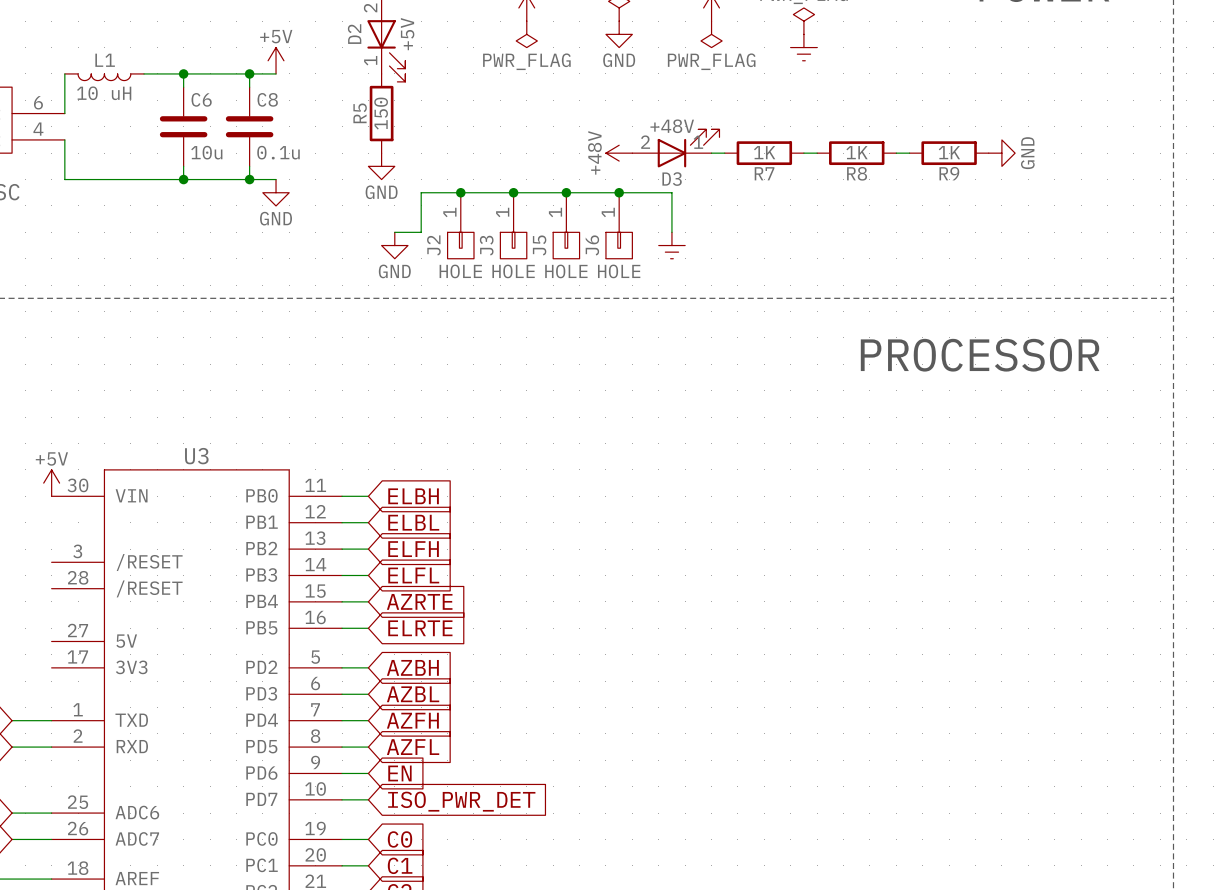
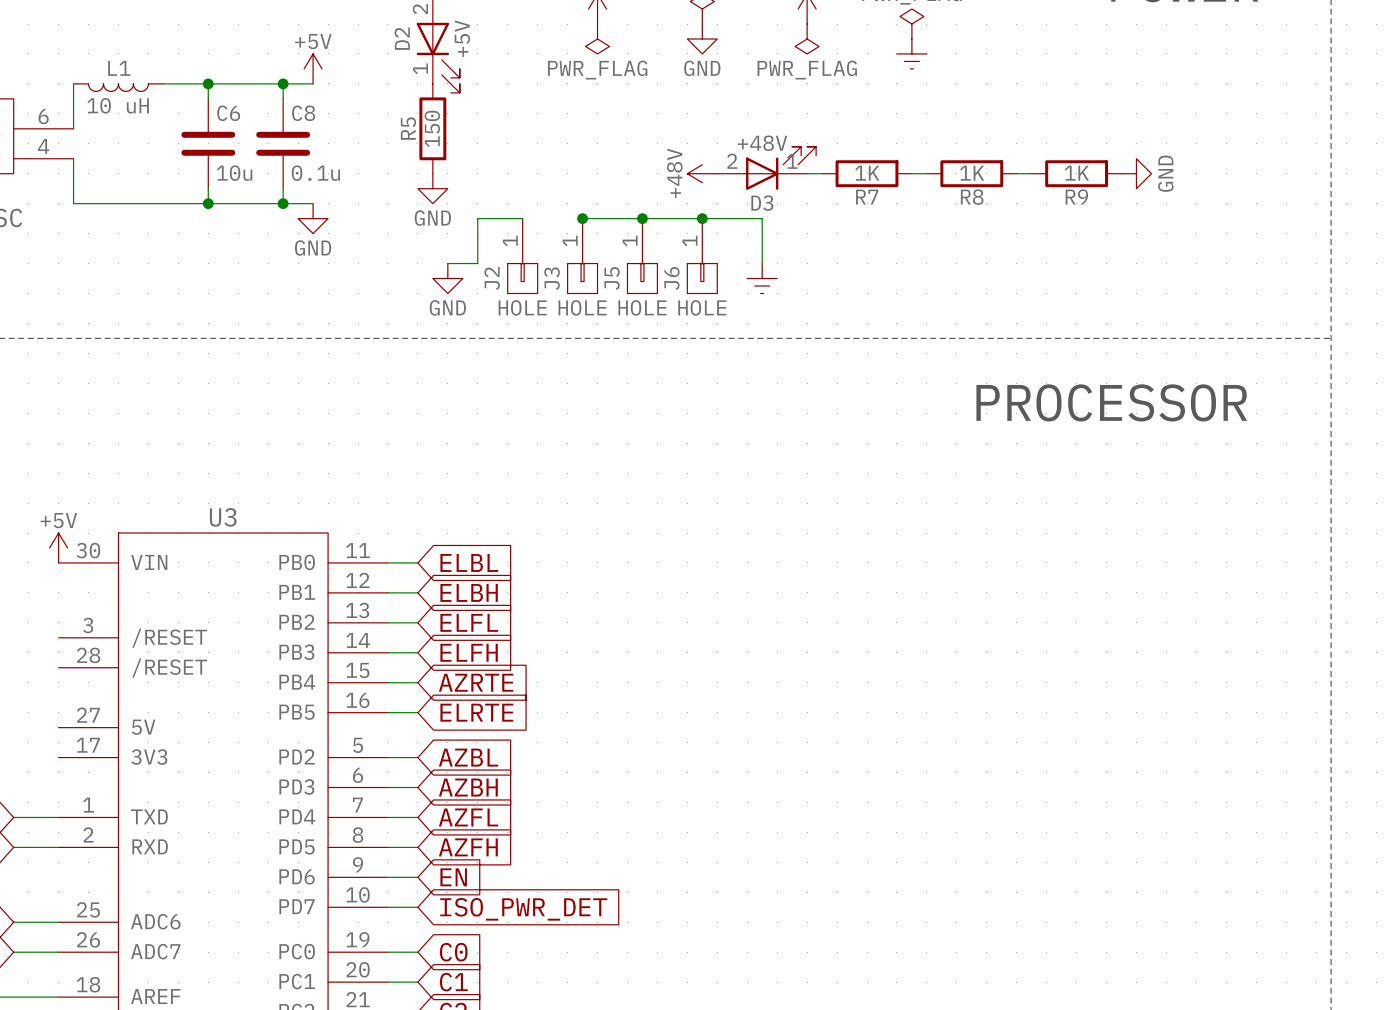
wire: (460, 192) (513, 192) -> none
junction: (460, 192) -> none
global label: ELBH (413, 496) -> ELBL (469, 562)
global label: ELBL (413, 522) -> ELBH (469, 592)
global label: ELFH (413, 549) -> ELFL (469, 622)
global label: ELFL (413, 575) -> ELFH (469, 652)
global label: AZBH (412, 667) -> AZBL (468, 757)
global label: AZBL (413, 694) -> AZBH (468, 787)
global label: AZFH (412, 720) -> AZFL (468, 817)
global label: AZFL (413, 747) -> AZFH (468, 847)

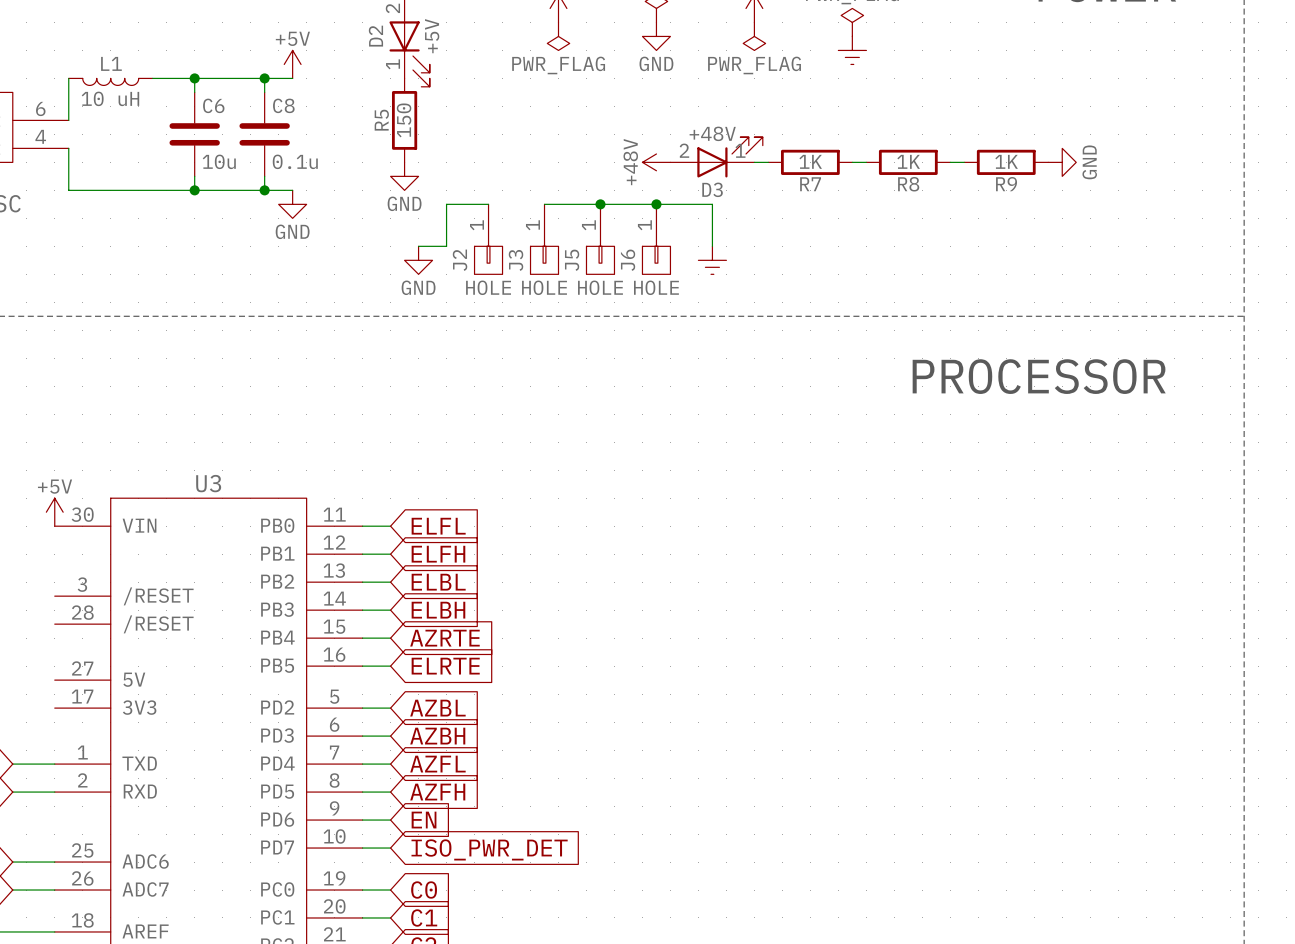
junction: (582, 218) -> none
global label: ELBL (469, 562) -> ELFL (438, 526)
global label: ELBH (469, 592) -> ELFH (438, 554)
global label: ELFL (469, 622) -> ELBL (438, 582)
global label: ELFH (469, 652) -> ELBH (438, 610)

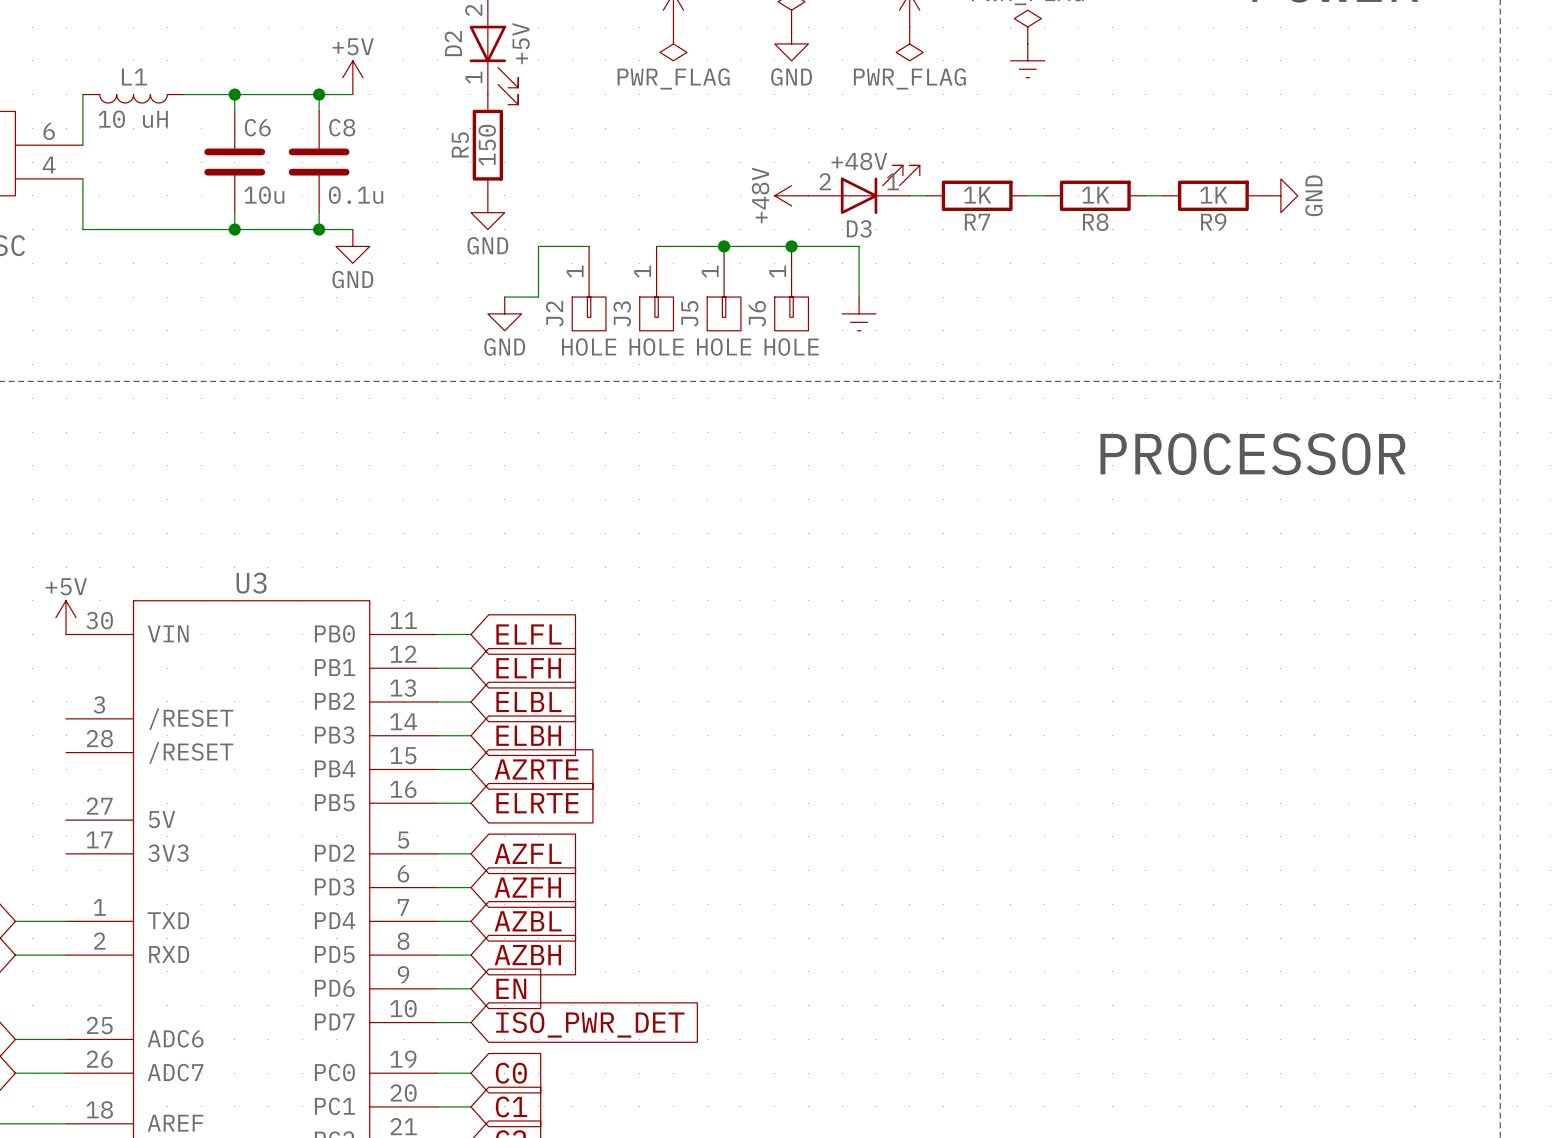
global label: AZBL (437, 708) -> AZFL (528, 853)
global label: AZBH (437, 736) -> AZFH (527, 887)
global label: AZFL (437, 764) -> AZBL (528, 921)
global label: AZFH (437, 792) -> AZBH (527, 955)

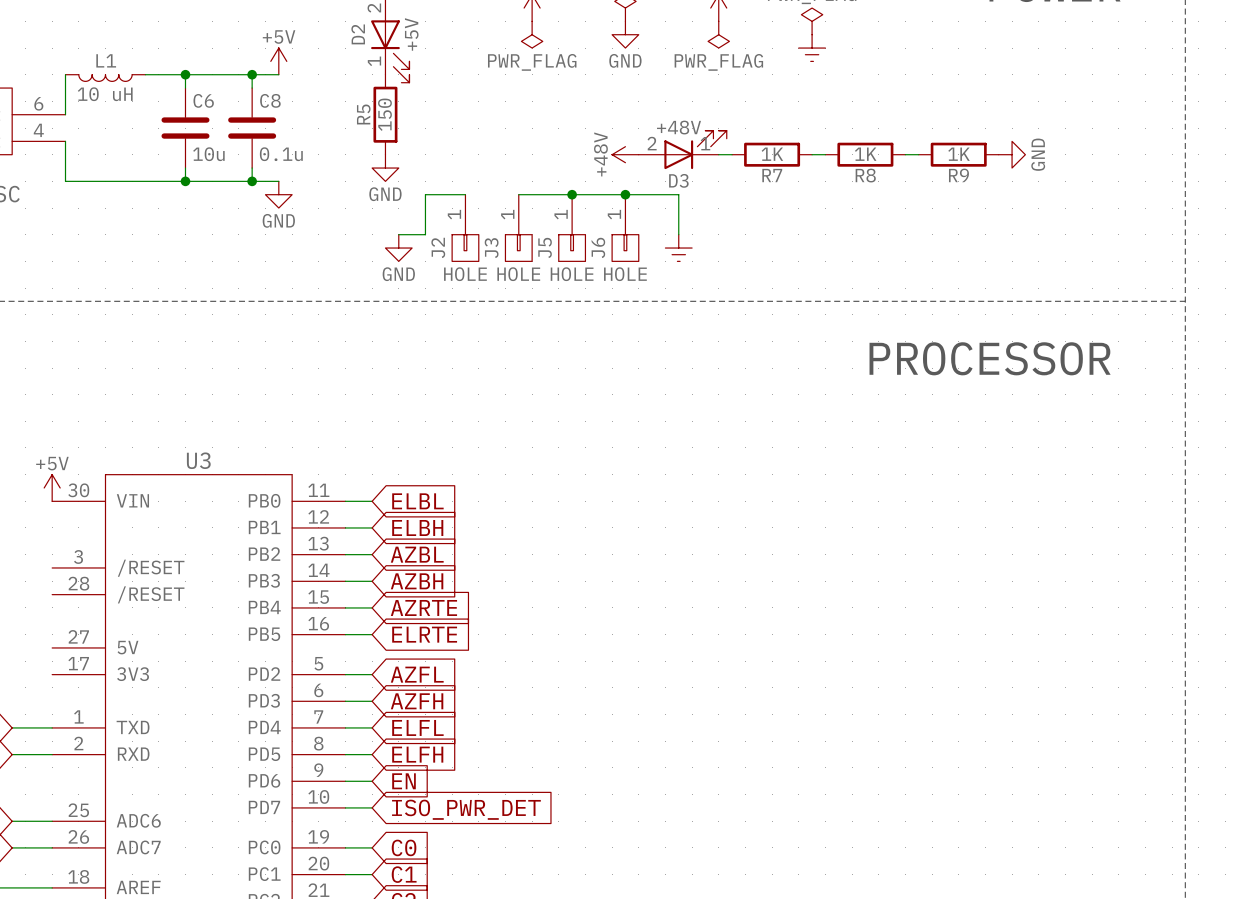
global label: ELFL (528, 634) -> ELBL (417, 501)
global label: ELFH (528, 668) -> ELBH (417, 527)
global label: ELBL (528, 701) -> AZBL (417, 554)
global label: ELBH (528, 735) -> AZBH (417, 581)
global label: AZBL (528, 921) -> ELFL (417, 727)
global label: AZBH (527, 955) -> ELFH (417, 754)

